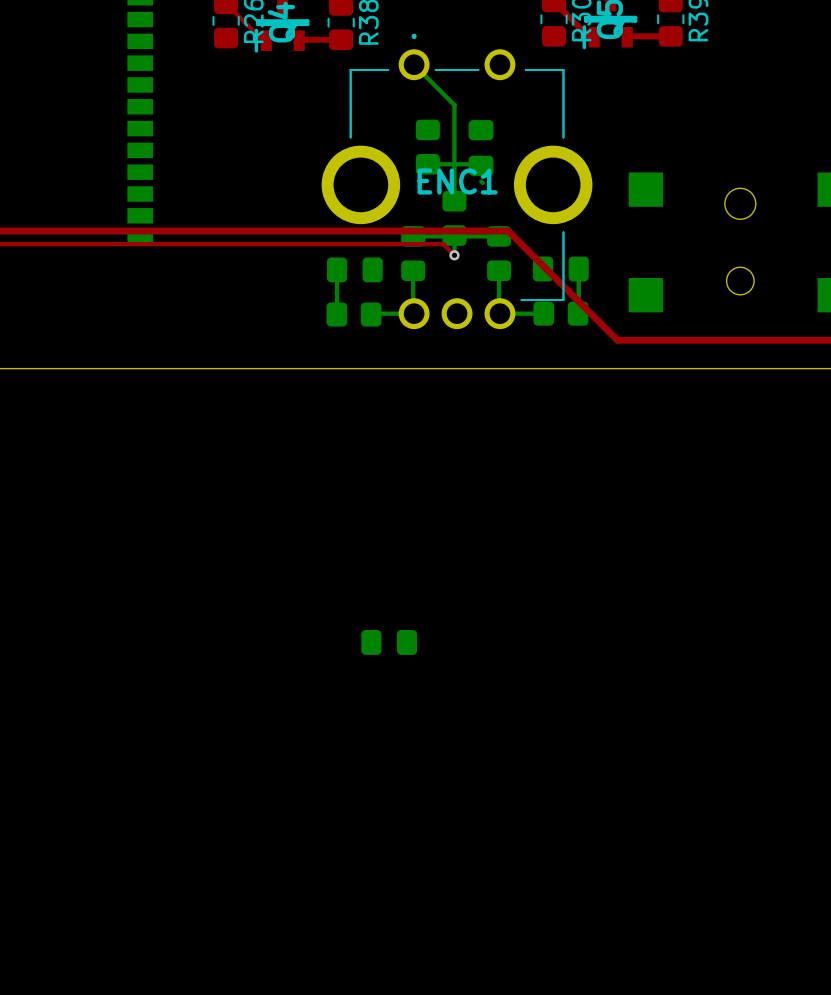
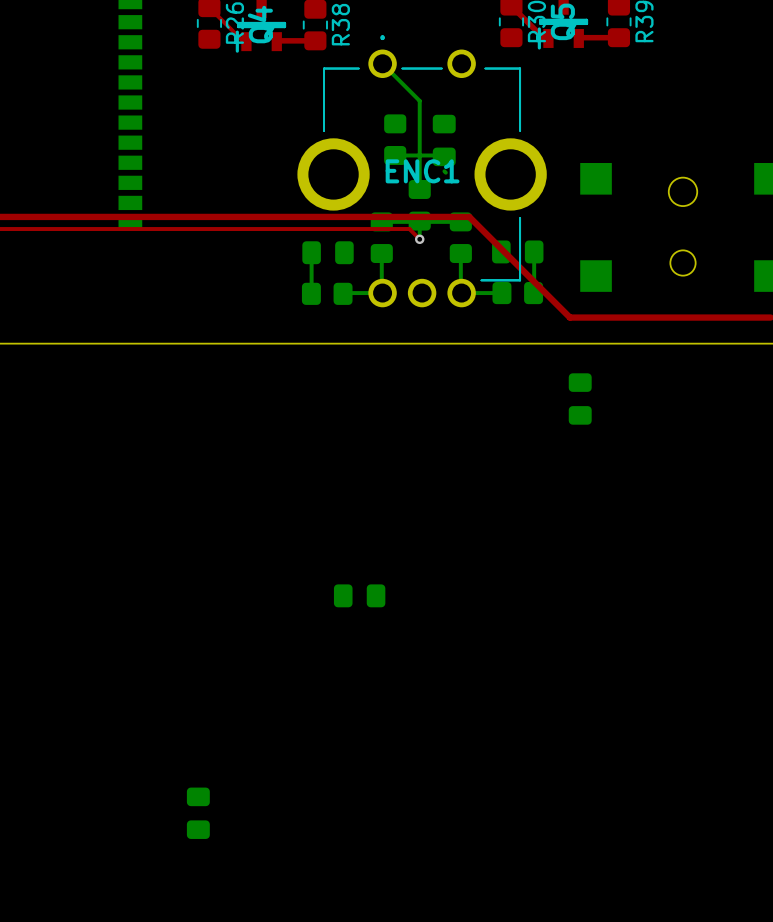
part: none -> (580, 398)
part: none -> (198, 813)

